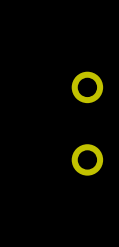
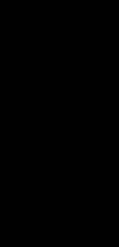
part: (87, 87) -> none
part: (87, 159) -> none

